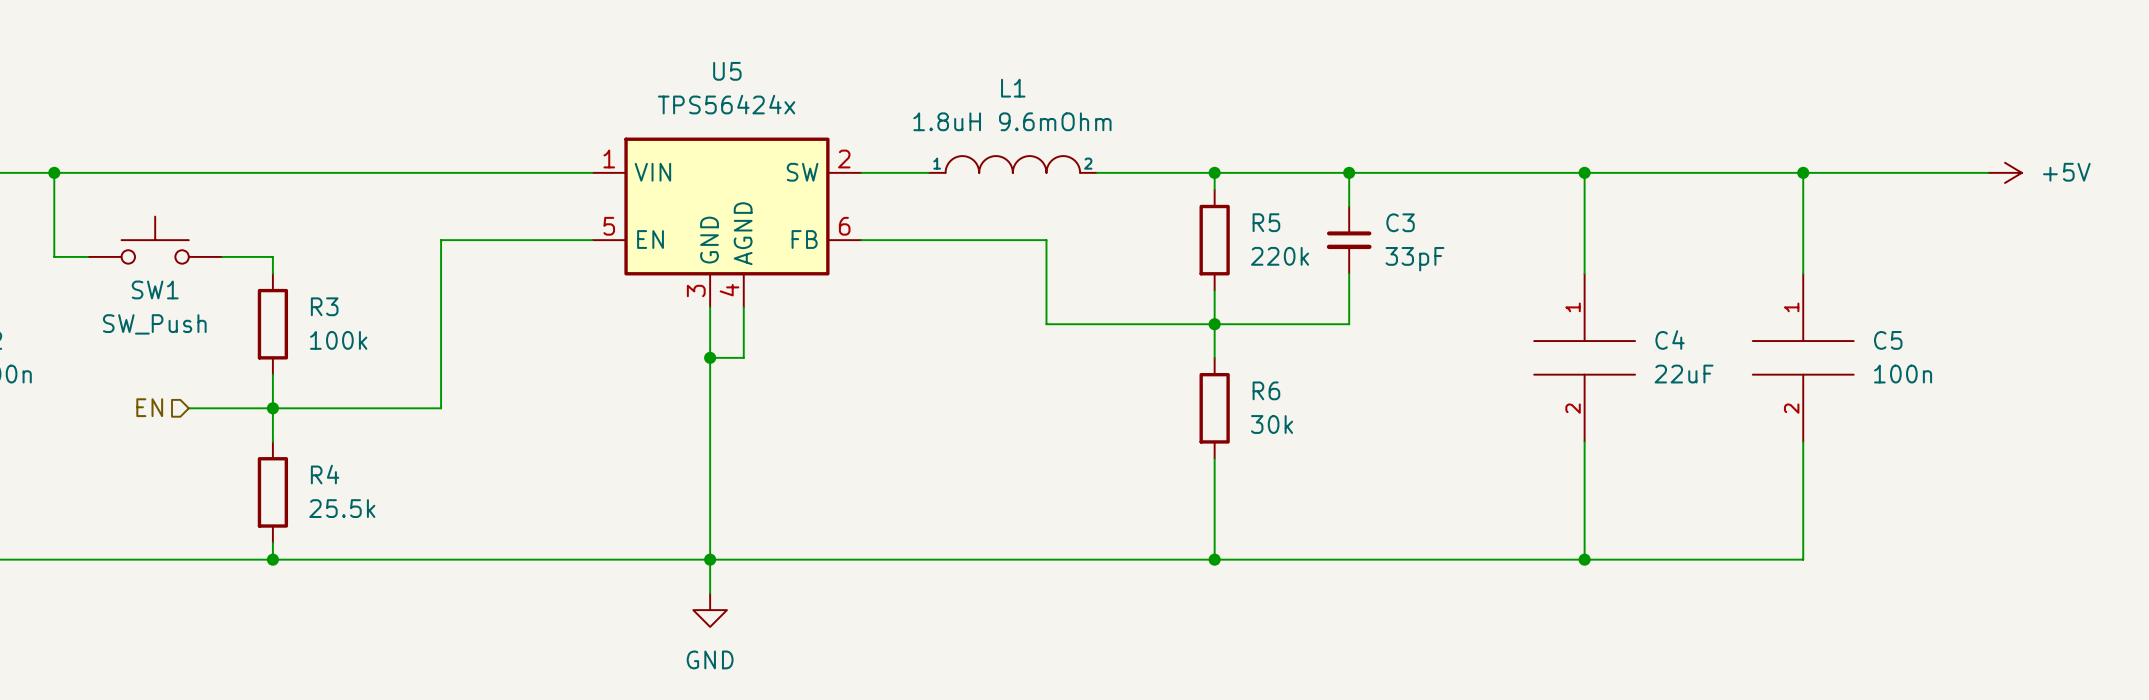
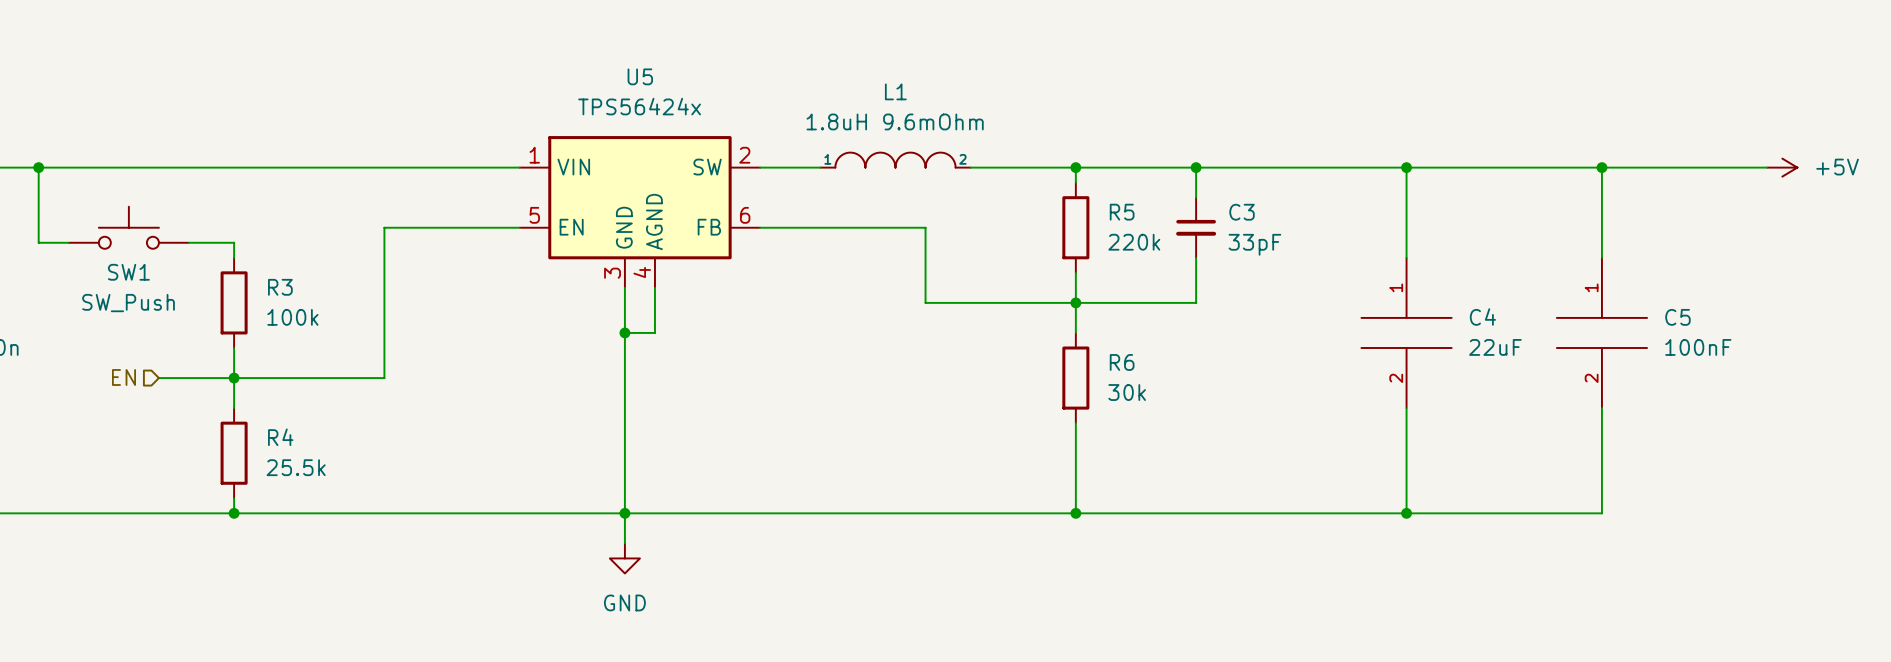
C5 value: 100n (1903, 374) -> 100nF (1698, 347)

